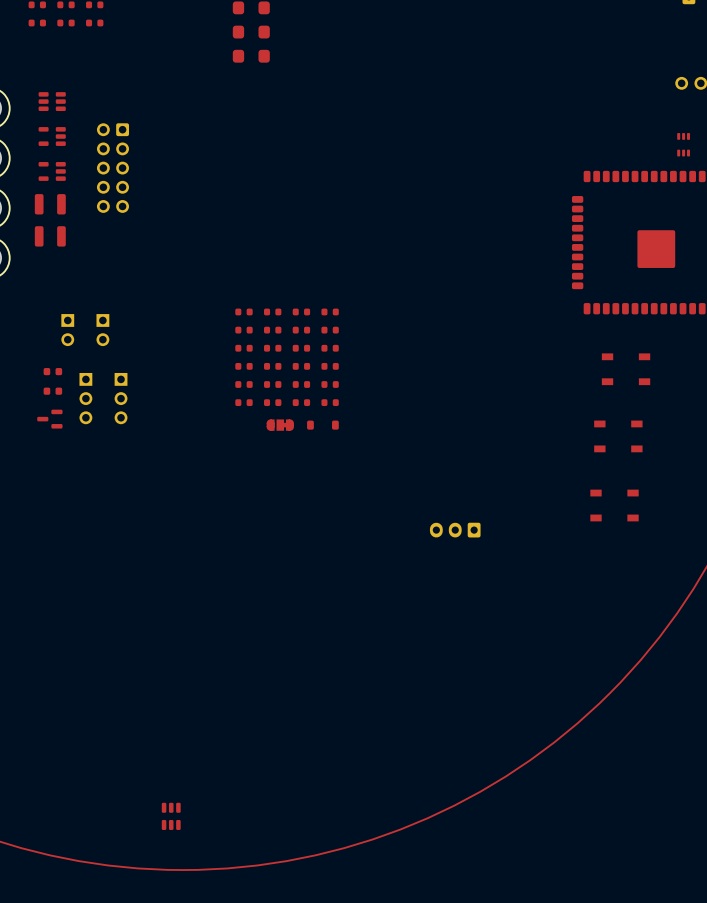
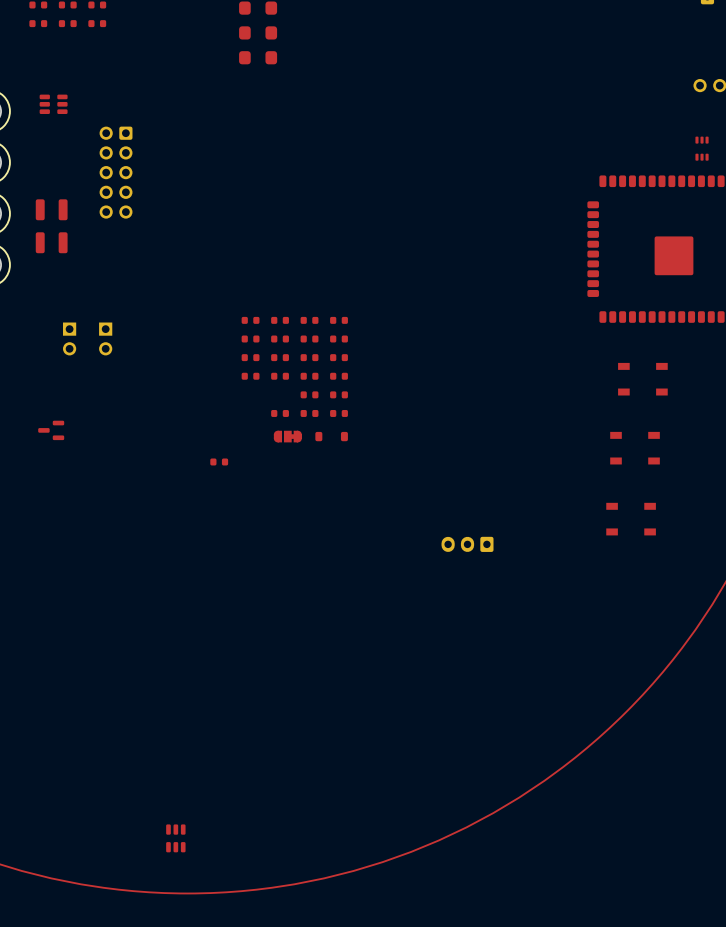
part: (52, 136) -> none
part: (52, 171) -> none
part: (52, 371) -> none
part: (243, 384) -> none
part: (272, 384) -> none
part: (52, 391) -> none
part: (85, 398) -> none
part: (121, 398) -> none
part: (243, 402) -> none
part: none -> (219, 461)

